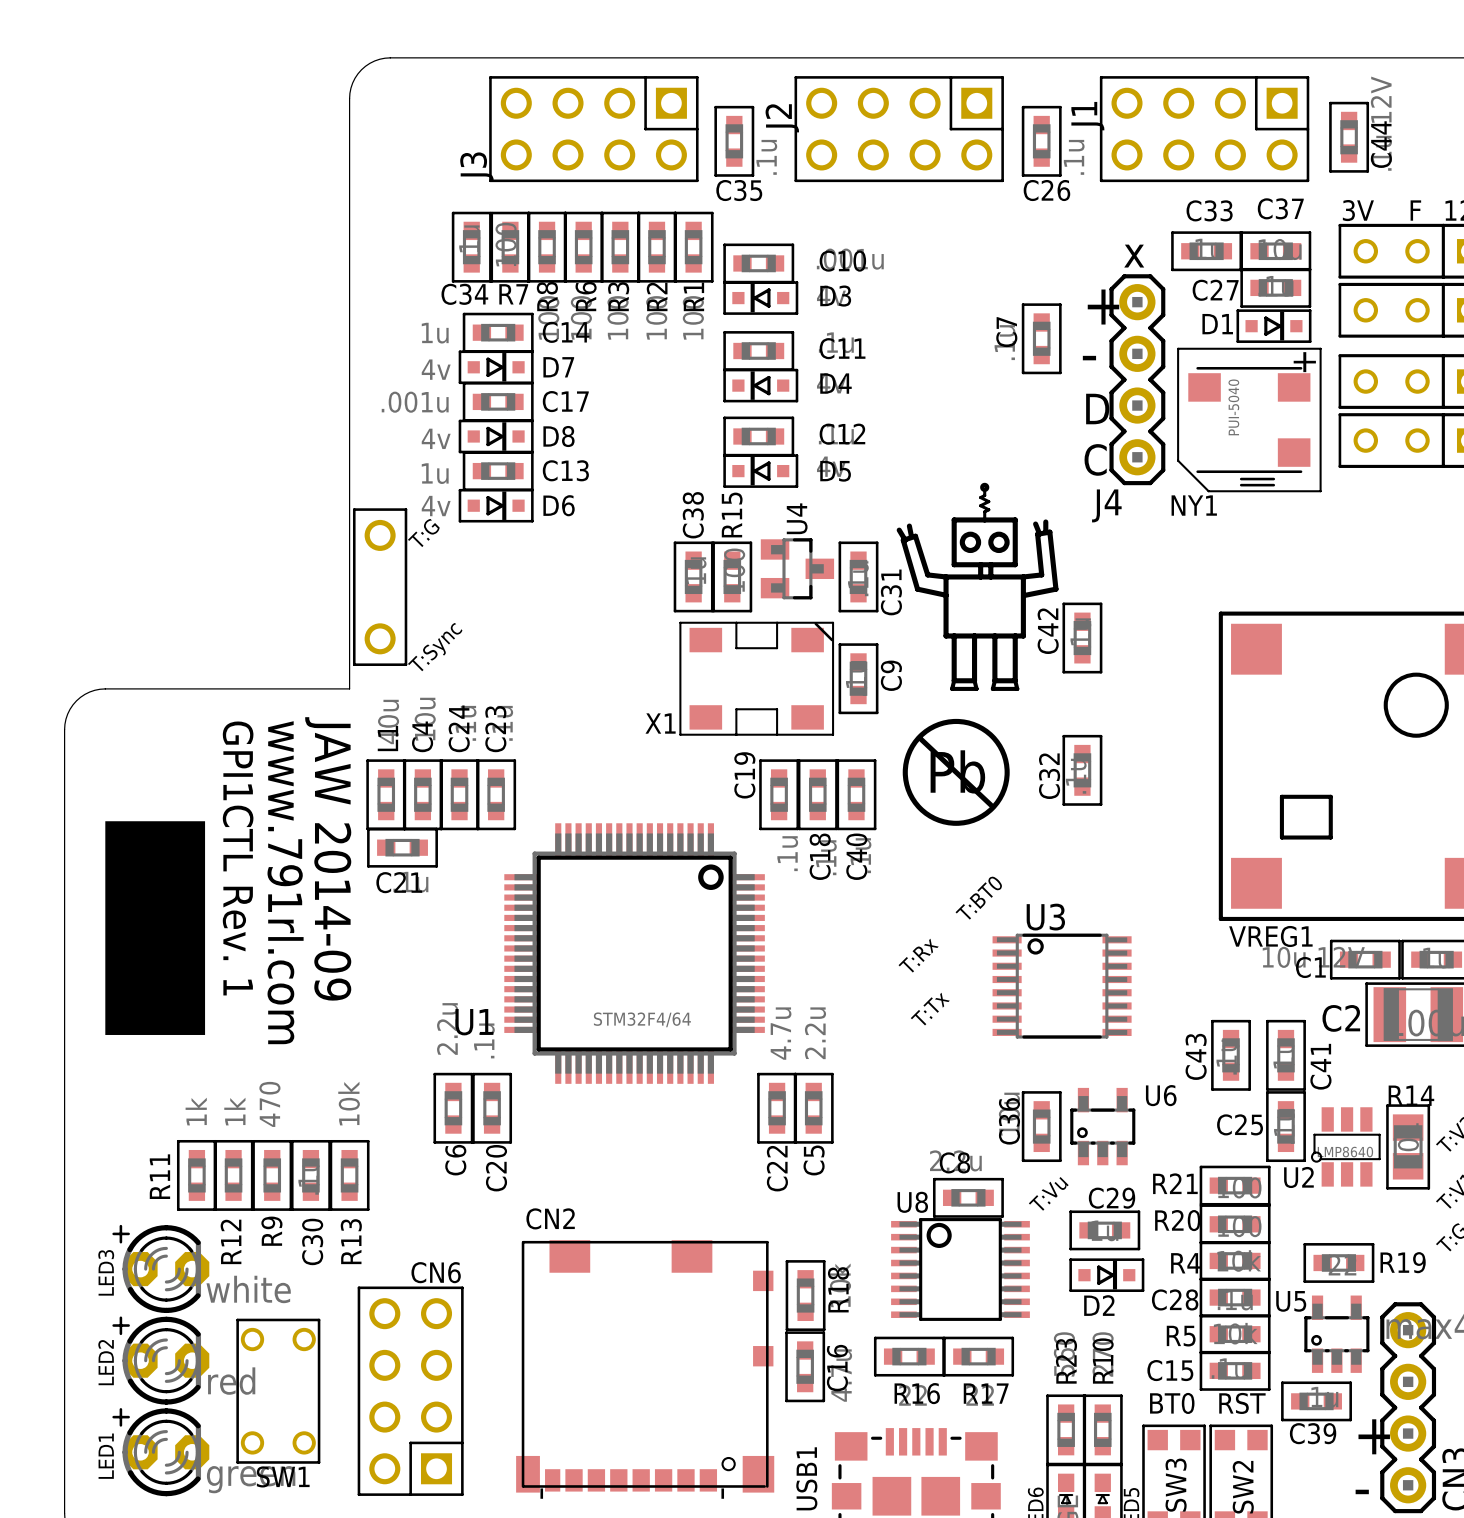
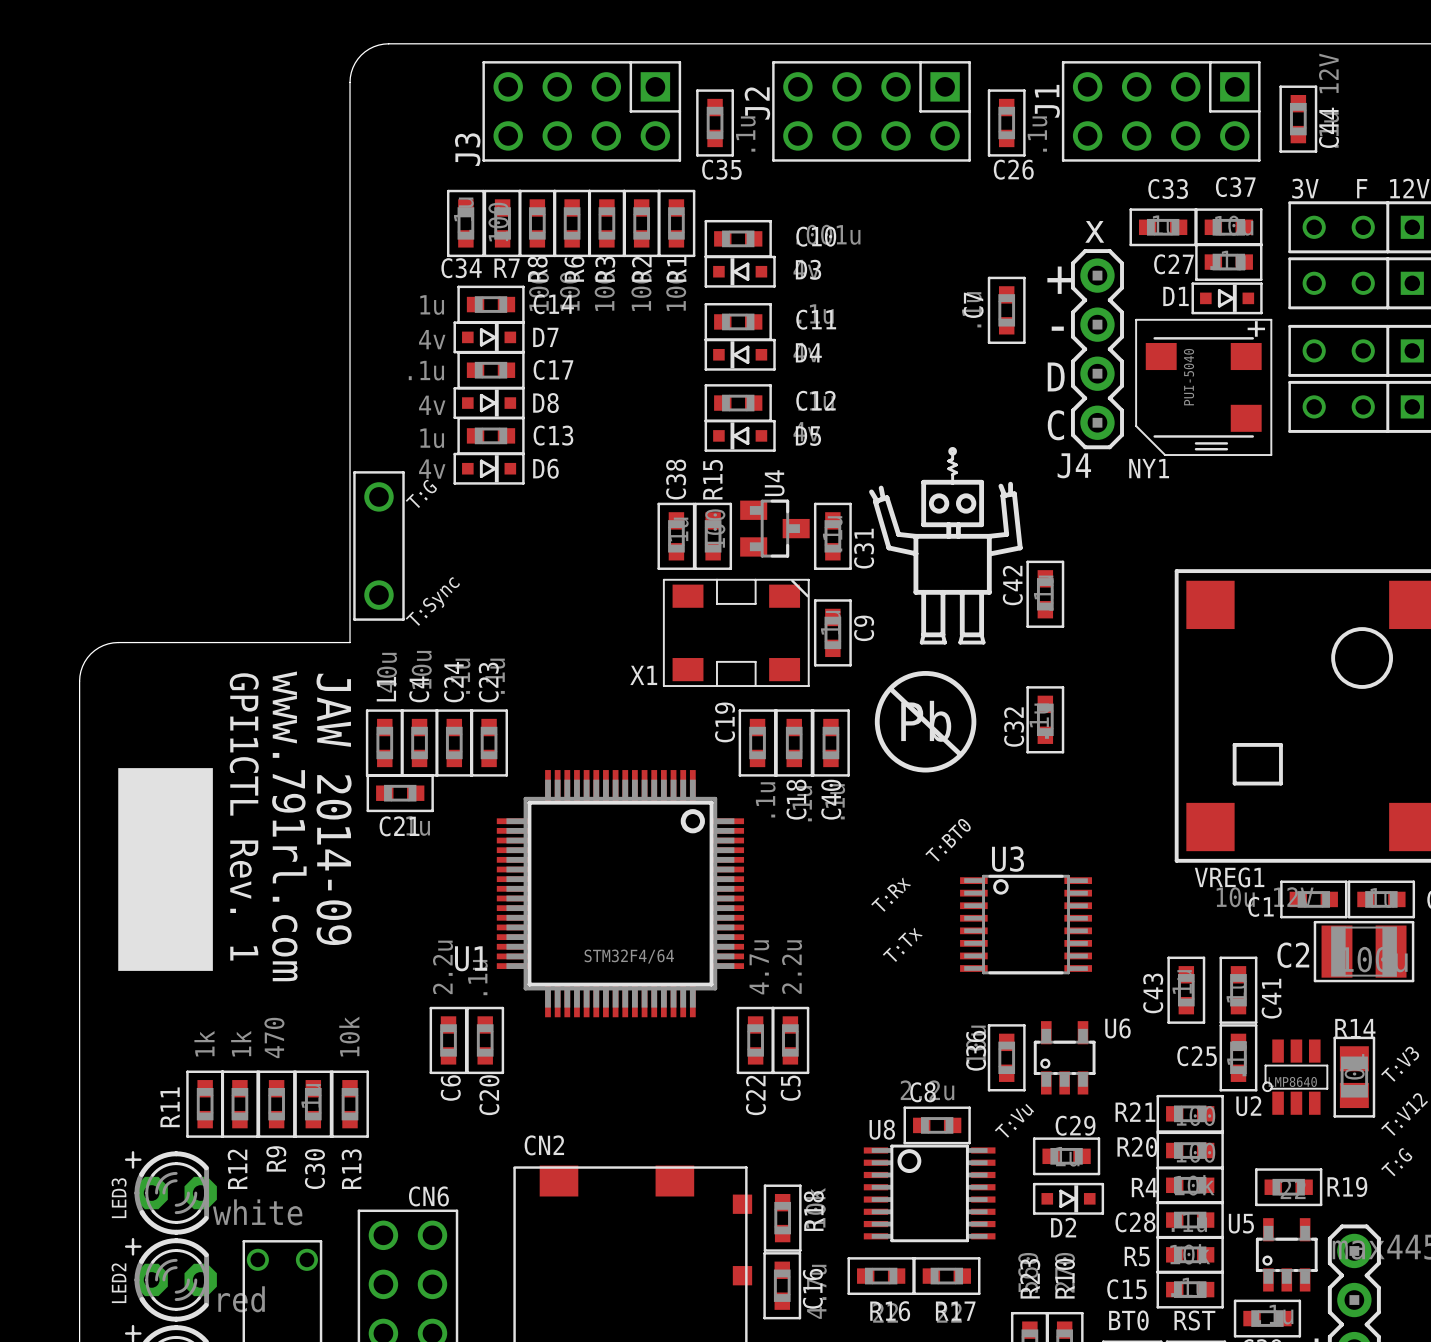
C17 value: .001u (415, 402) -> .1u (426, 370)

